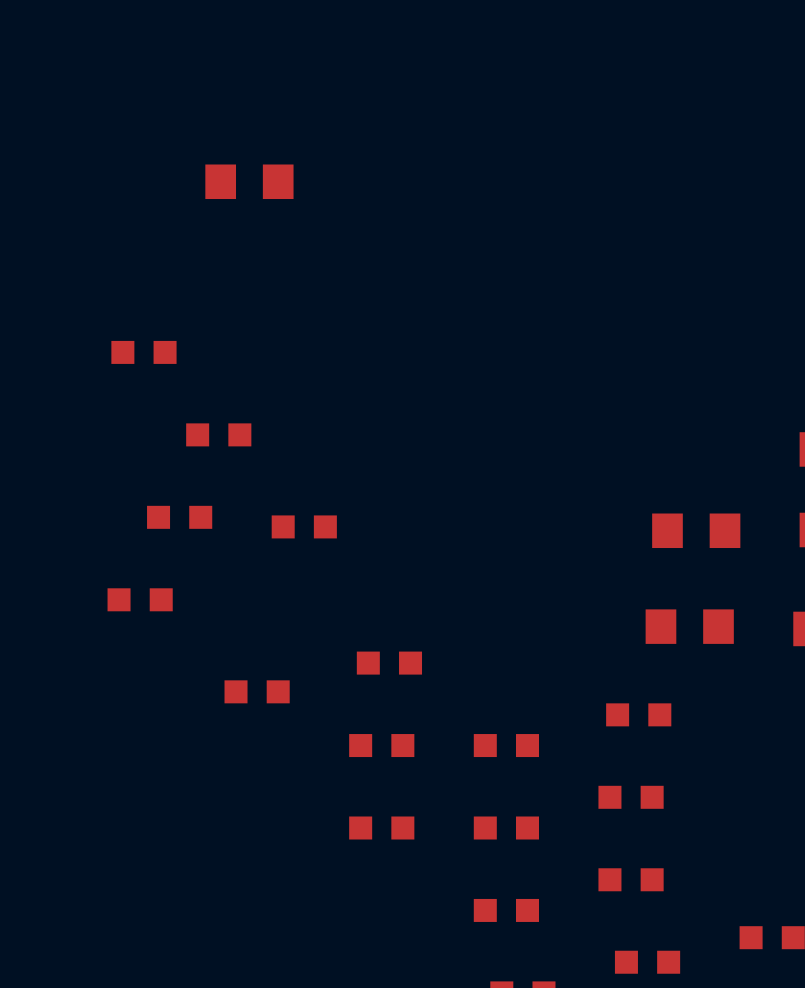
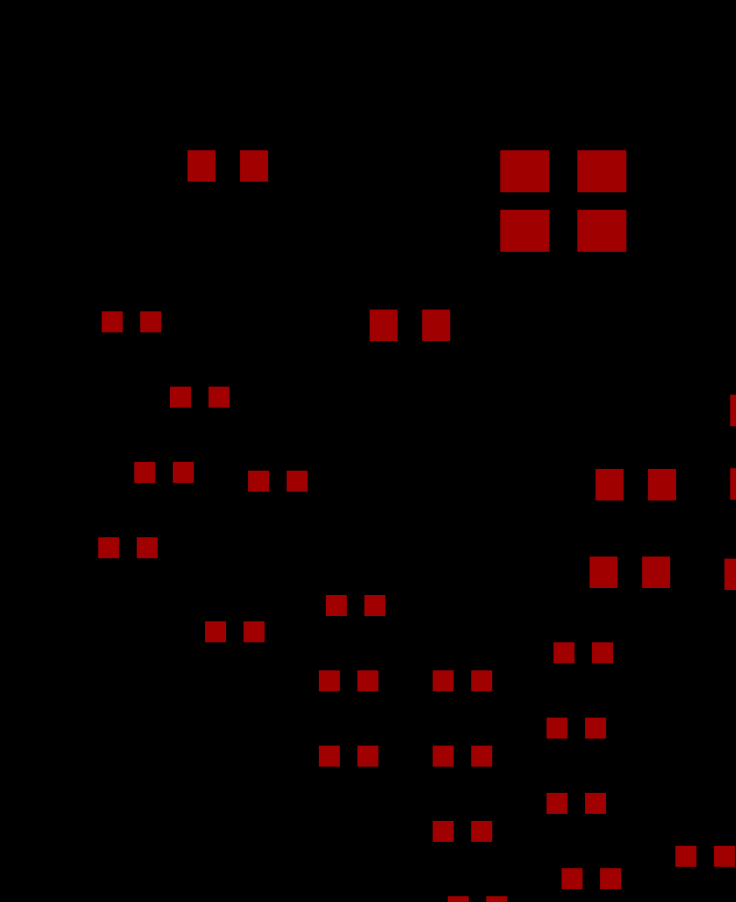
part: none -> (563, 201)
part: none -> (409, 325)

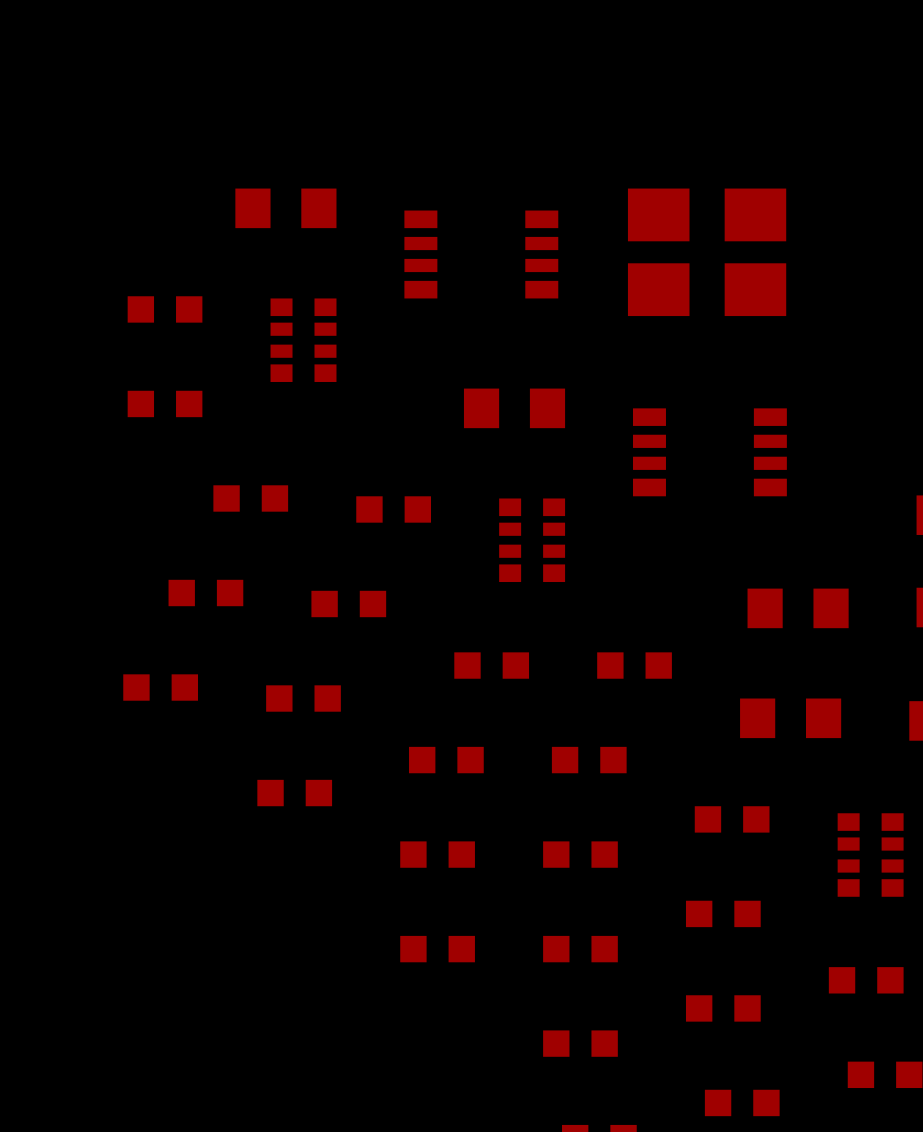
part: none -> (481, 254)
part: none -> (165, 309)
part: none -> (303, 340)
part: none -> (709, 452)
part: none -> (393, 509)
part: none -> (532, 540)
part: none -> (491, 665)
part: none -> (634, 665)
part: none -> (303, 698)
part: none -> (589, 760)
part: none -> (870, 855)
part: none -> (866, 980)

